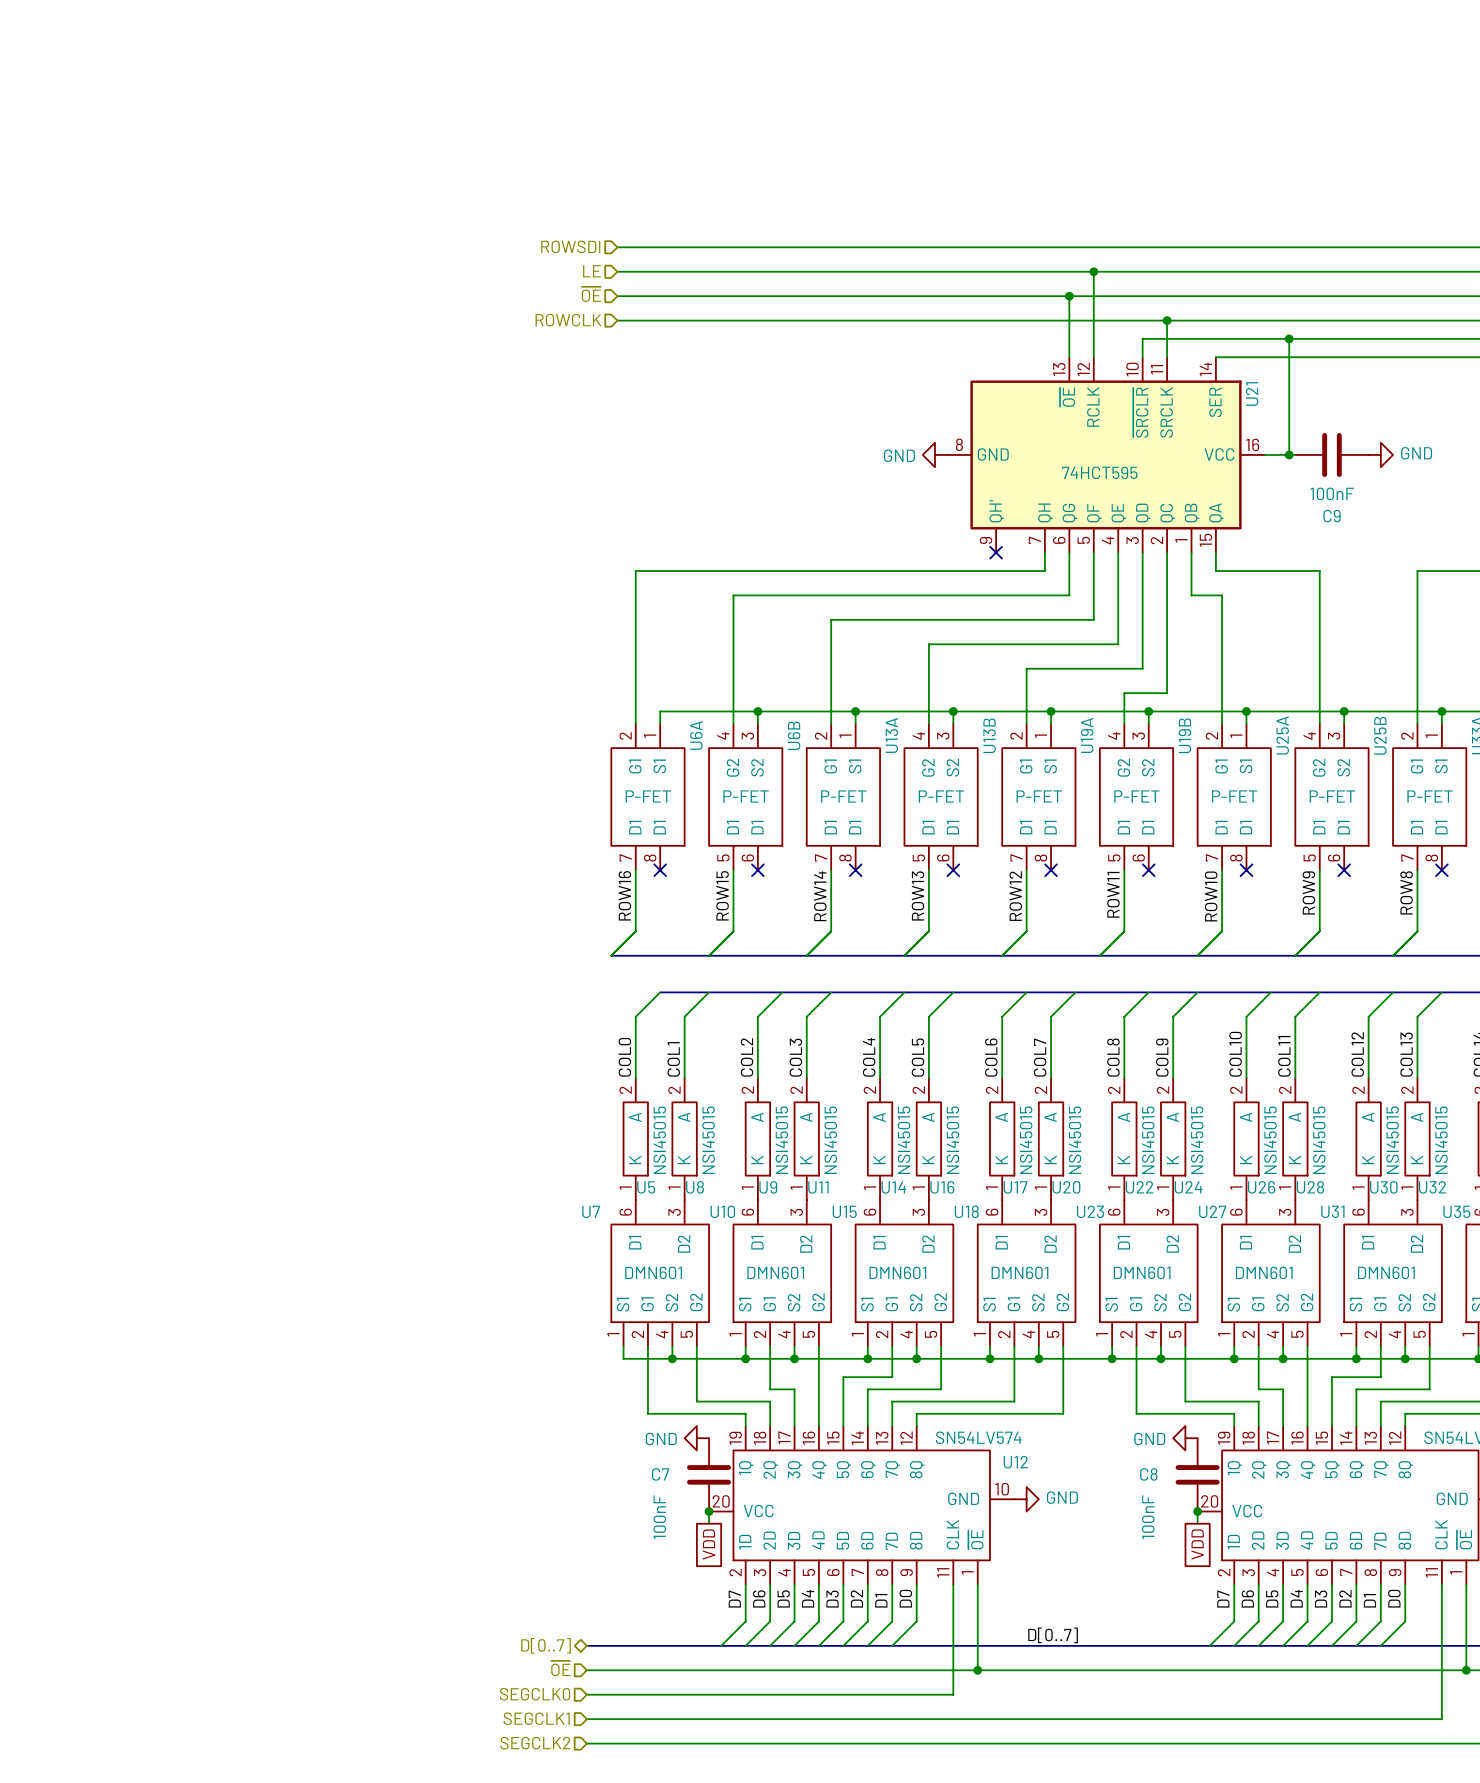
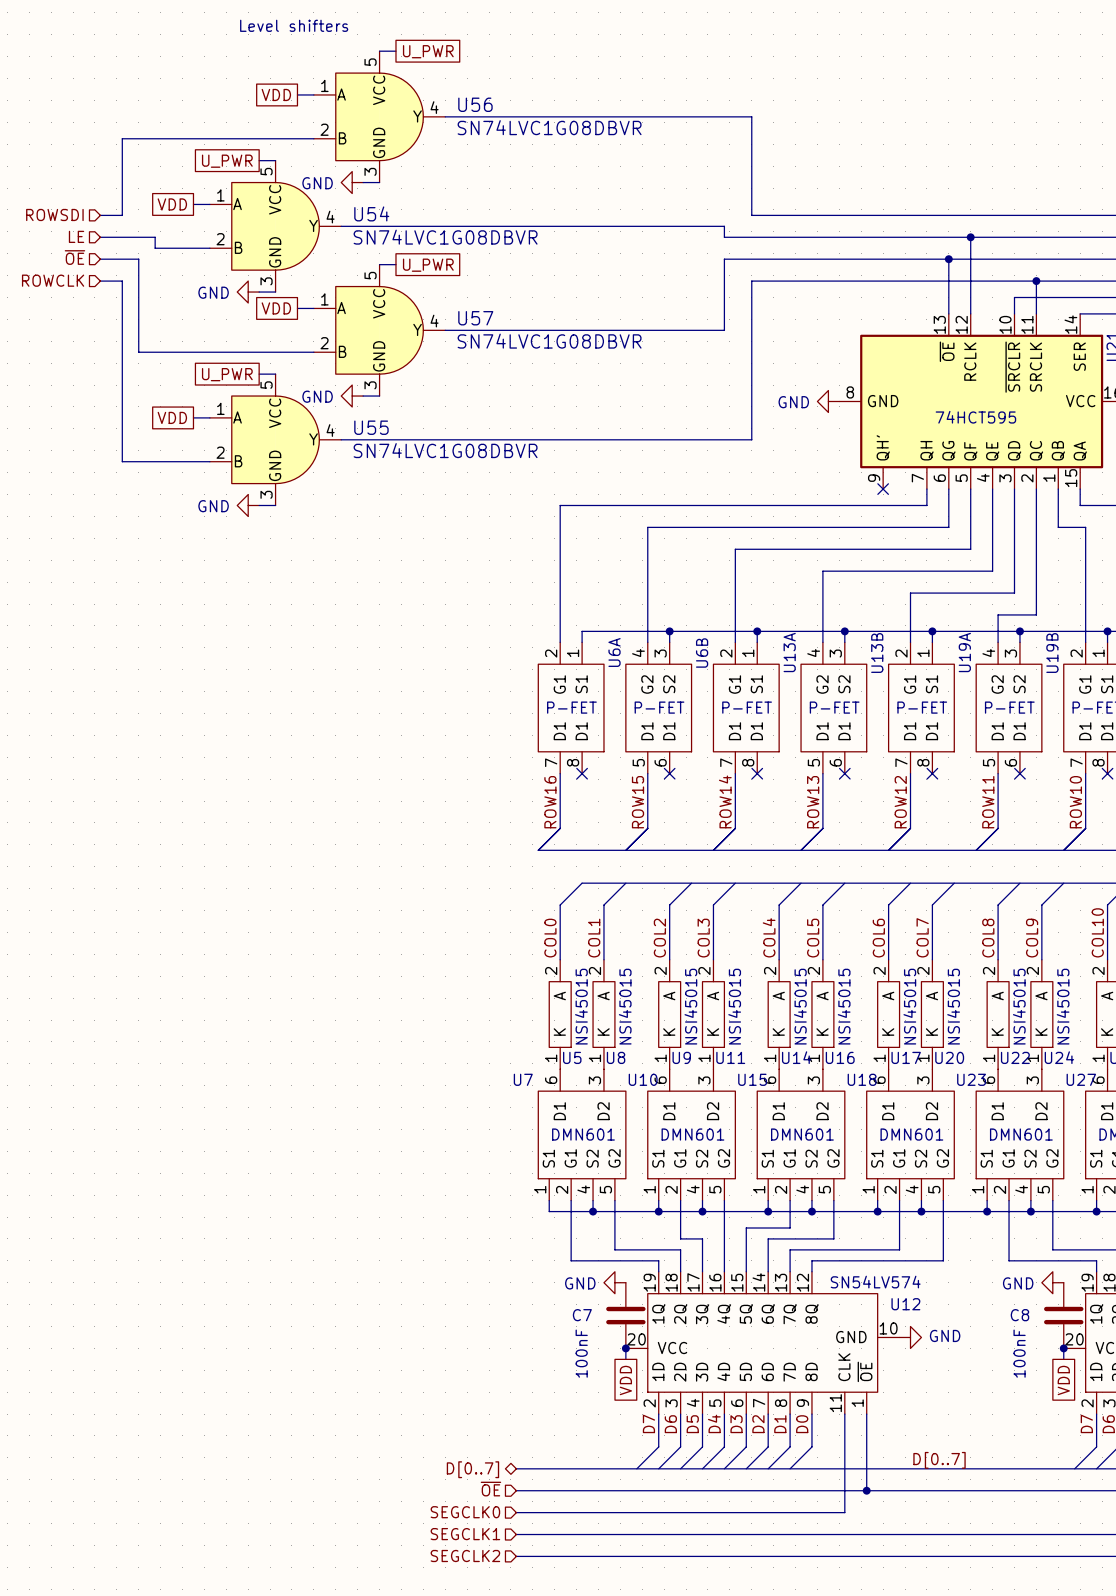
text: none -> Level shifters (294, 25)
wire: none -> (379, 51) (395, 51)
global label: none -> U_PWR (428, 51)
global label: none -> VDD (276, 94)
wire: none -> (297, 94) (313, 94)
U56: none -> SN74LVC1G08DBVR (379, 116)
wire: none -> (313, 138) (122, 138) (122, 215) (100, 215)
global label: none -> U_PWR (227, 161)
wire: none -> (259, 160) (275, 160)
power symbol: none -> GND (352, 182)
wire: none -> (363, 182) (379, 182)
global label: none -> VDD (172, 204)
wire: none -> (193, 204) (209, 204)
hierarchical label: none -> ROWSDI (54, 214)
hierarchical label: ROWSDI (570, 246) -> none
wire: (617, 247) (849, 247) -> (445, 116) (751, 116) (751, 215)
U54: none -> SN74LVC1G08DBVR (275, 226)
hierarchical label: none -> LE (76, 236)
wire: none -> (100, 237) (155, 237) (155, 248) (209, 248)
hierarchical label: LE (592, 271) -> none
wire: (617, 271) (818, 271) -> (341, 226) (724, 226) (724, 237)
hierarchical label: none -> ~{OE} (74, 257)
hierarchical label: ~{OE} (591, 294) -> none
wire: none -> (100, 259) (138, 259) (138, 352) (313, 352)
wire: (617, 296) (818, 296) -> (445, 330) (724, 330) (724, 259)
wire: none -> (379, 264) (395, 264)
global label: none -> U_PWR (428, 265)
hierarchical label: none -> ROWCLK (53, 280)
wire: none -> (100, 281) (122, 281) (122, 461) (209, 461)
hierarchical label: ROWCLK (568, 320) -> none
wire: (617, 320) (849, 320) -> (341, 439) (751, 439) (751, 281)
power symbol: none -> GND (248, 292)
wire: none -> (259, 292) (275, 292)
global label: none -> VDD (276, 308)
wire: none -> (297, 308) (313, 308)
U57: none -> SN74LVC1G08DBVR (379, 330)
global label: none -> U_PWR (227, 374)
wire: none -> (259, 374) (275, 374)
power symbol: none -> GND (352, 396)
wire: none -> (363, 396) (379, 396)
global label: none -> VDD (172, 417)
wire: none -> (193, 417) (209, 417)
U55: none -> SN74LVC1G08DBVR (275, 439)
power symbol: none -> GND (248, 505)
wire: none -> (259, 505) (275, 505)

